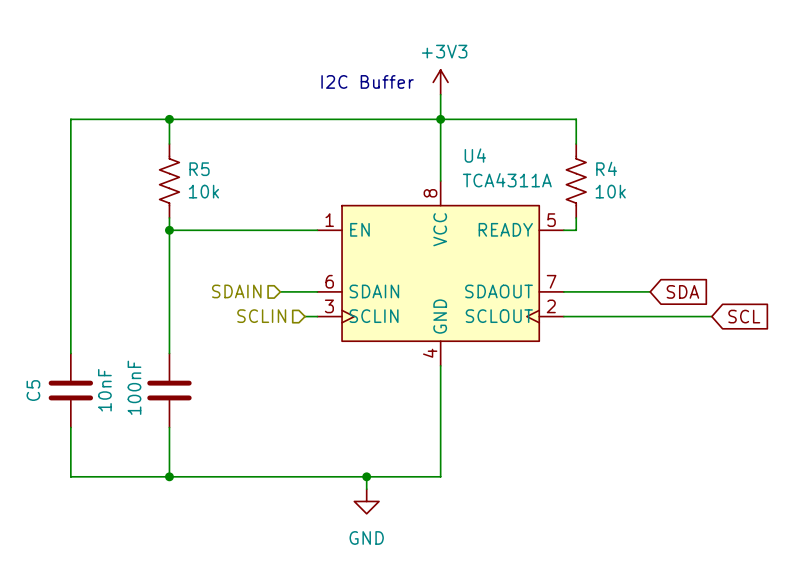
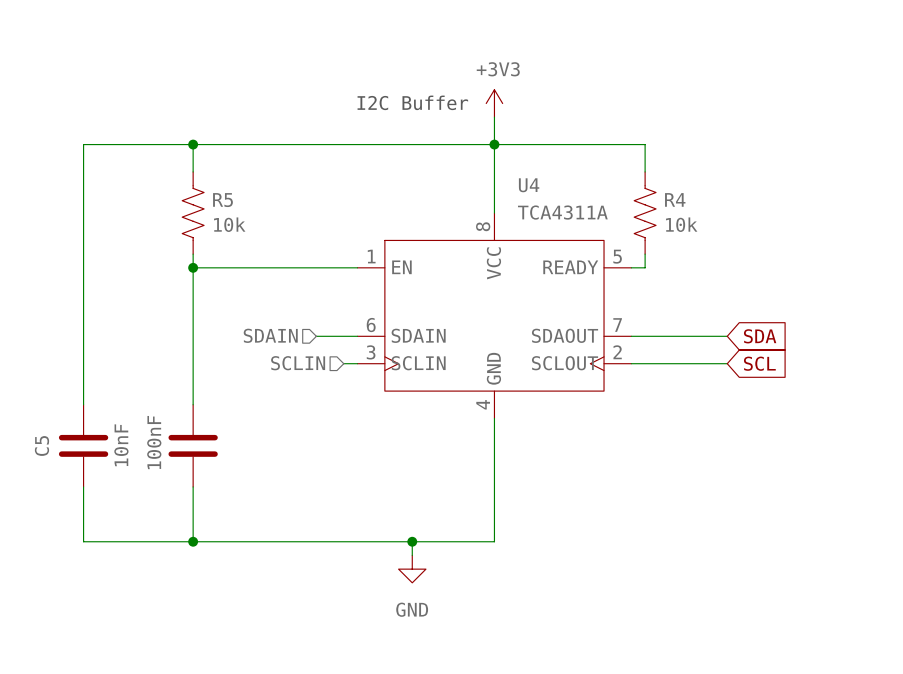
wire: (650, 316) (711, 316) -> none
global label position: SCL (744, 316) -> SCL (759, 363)

